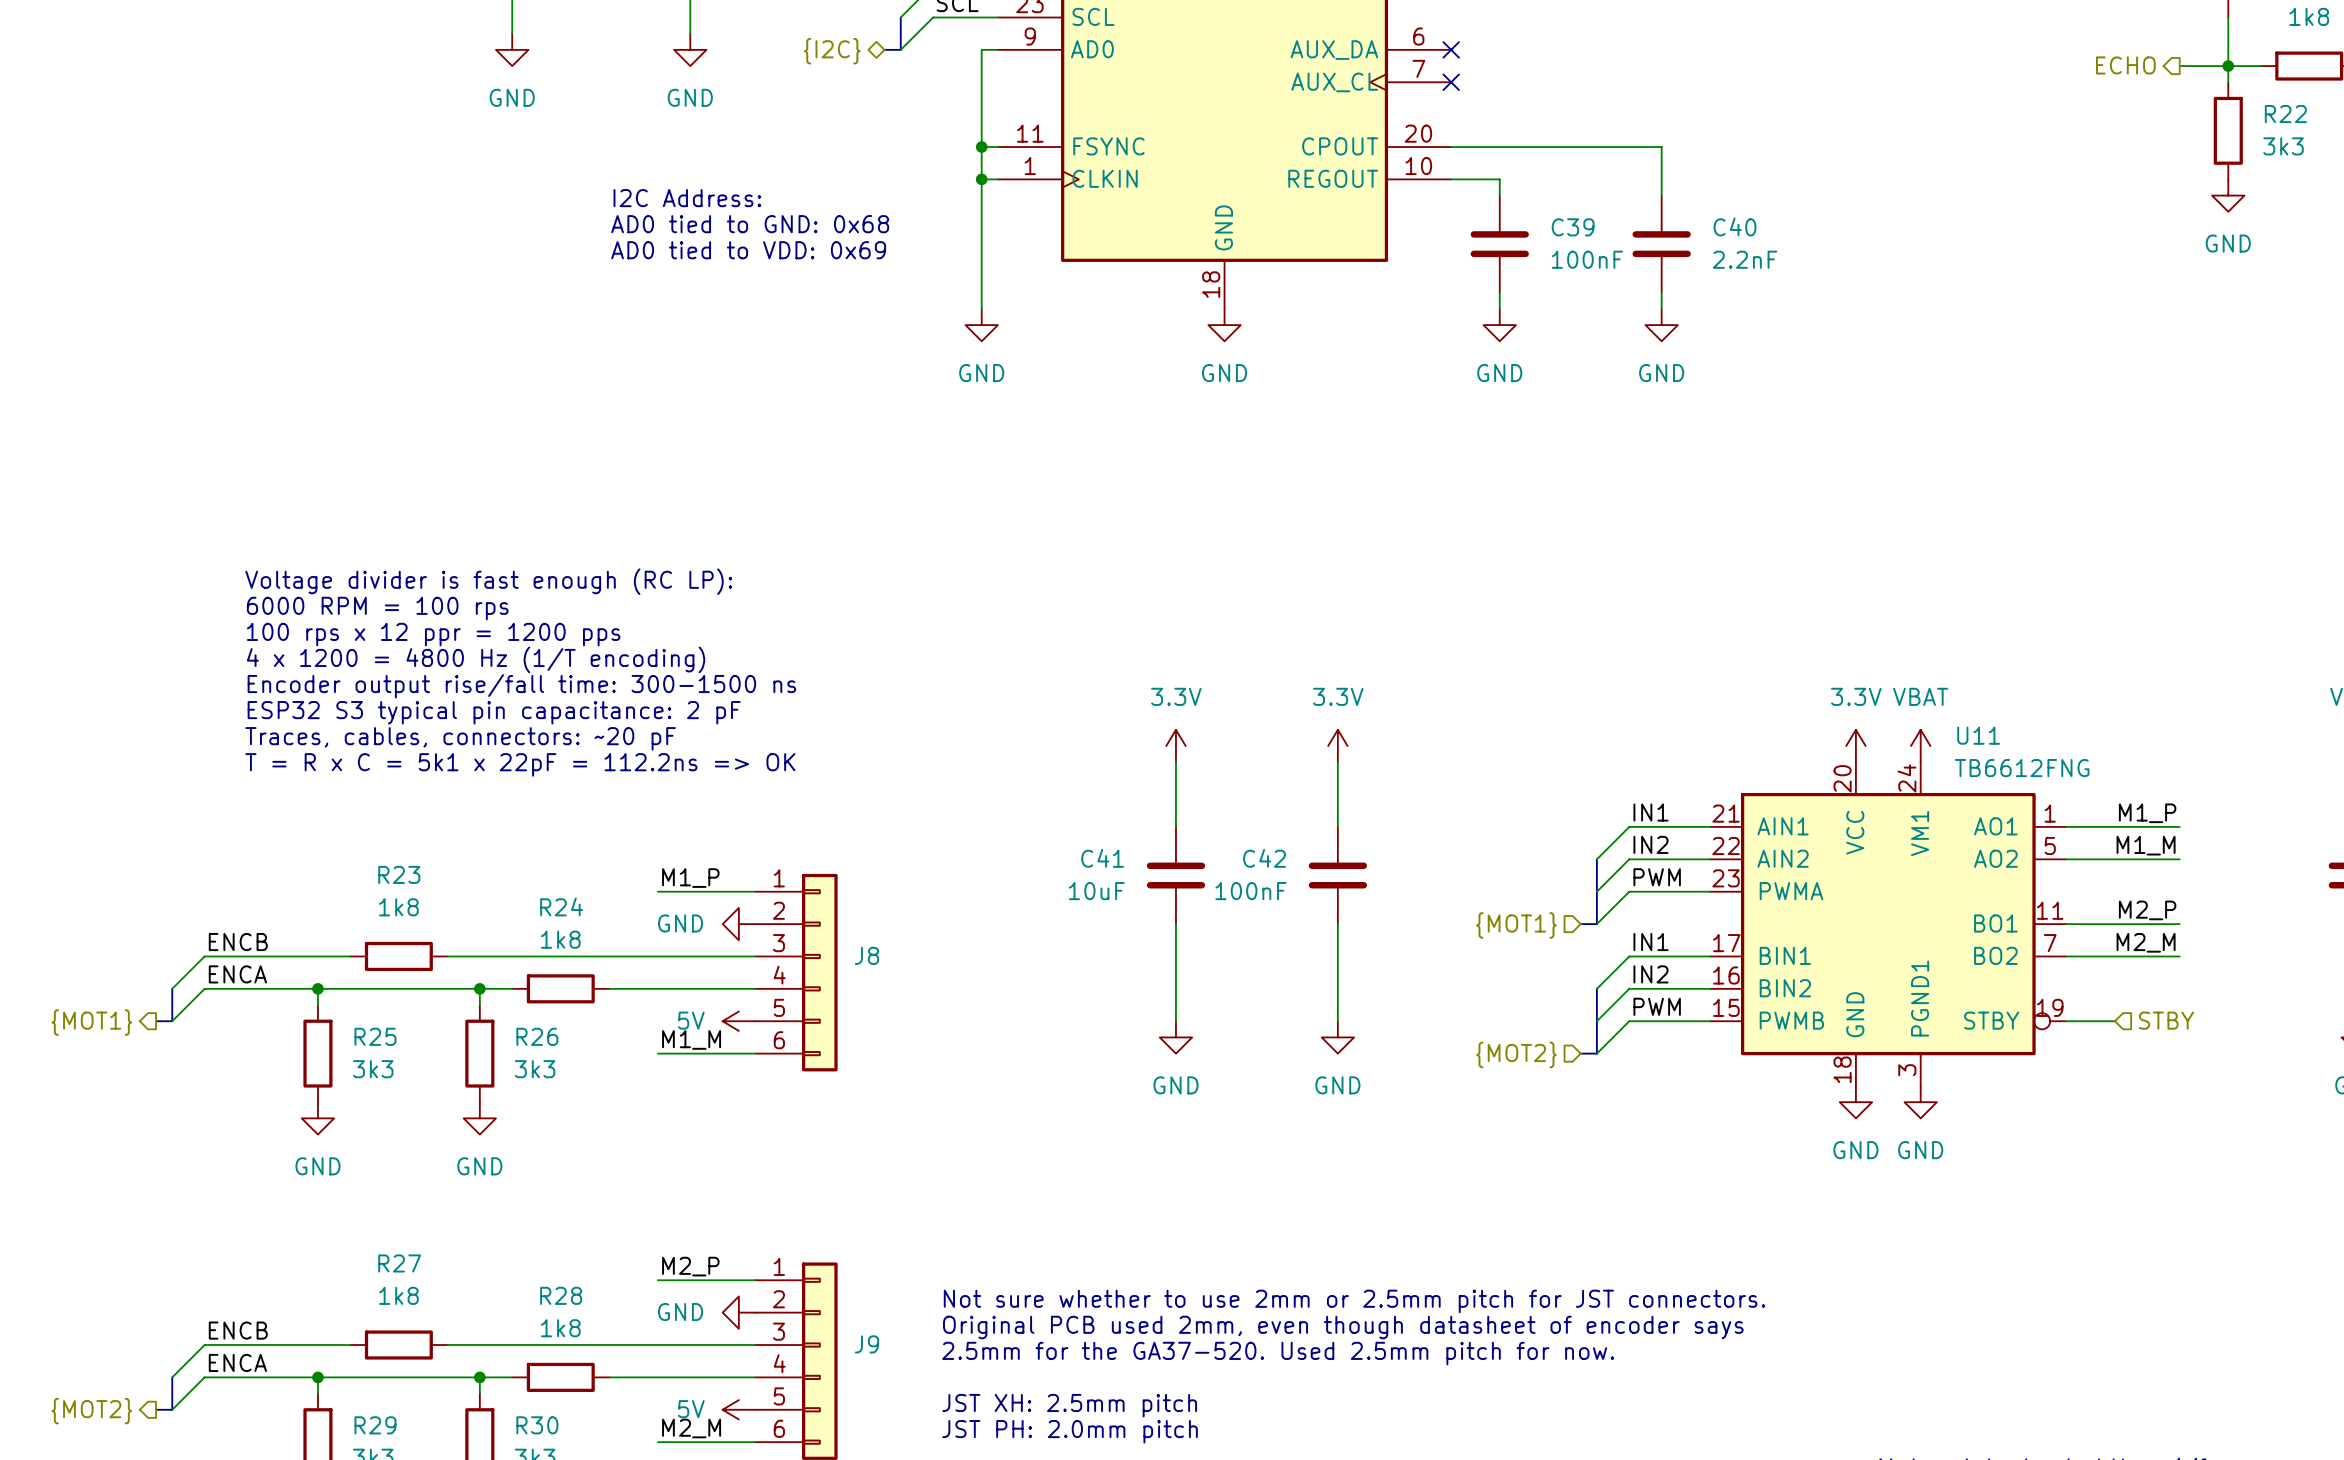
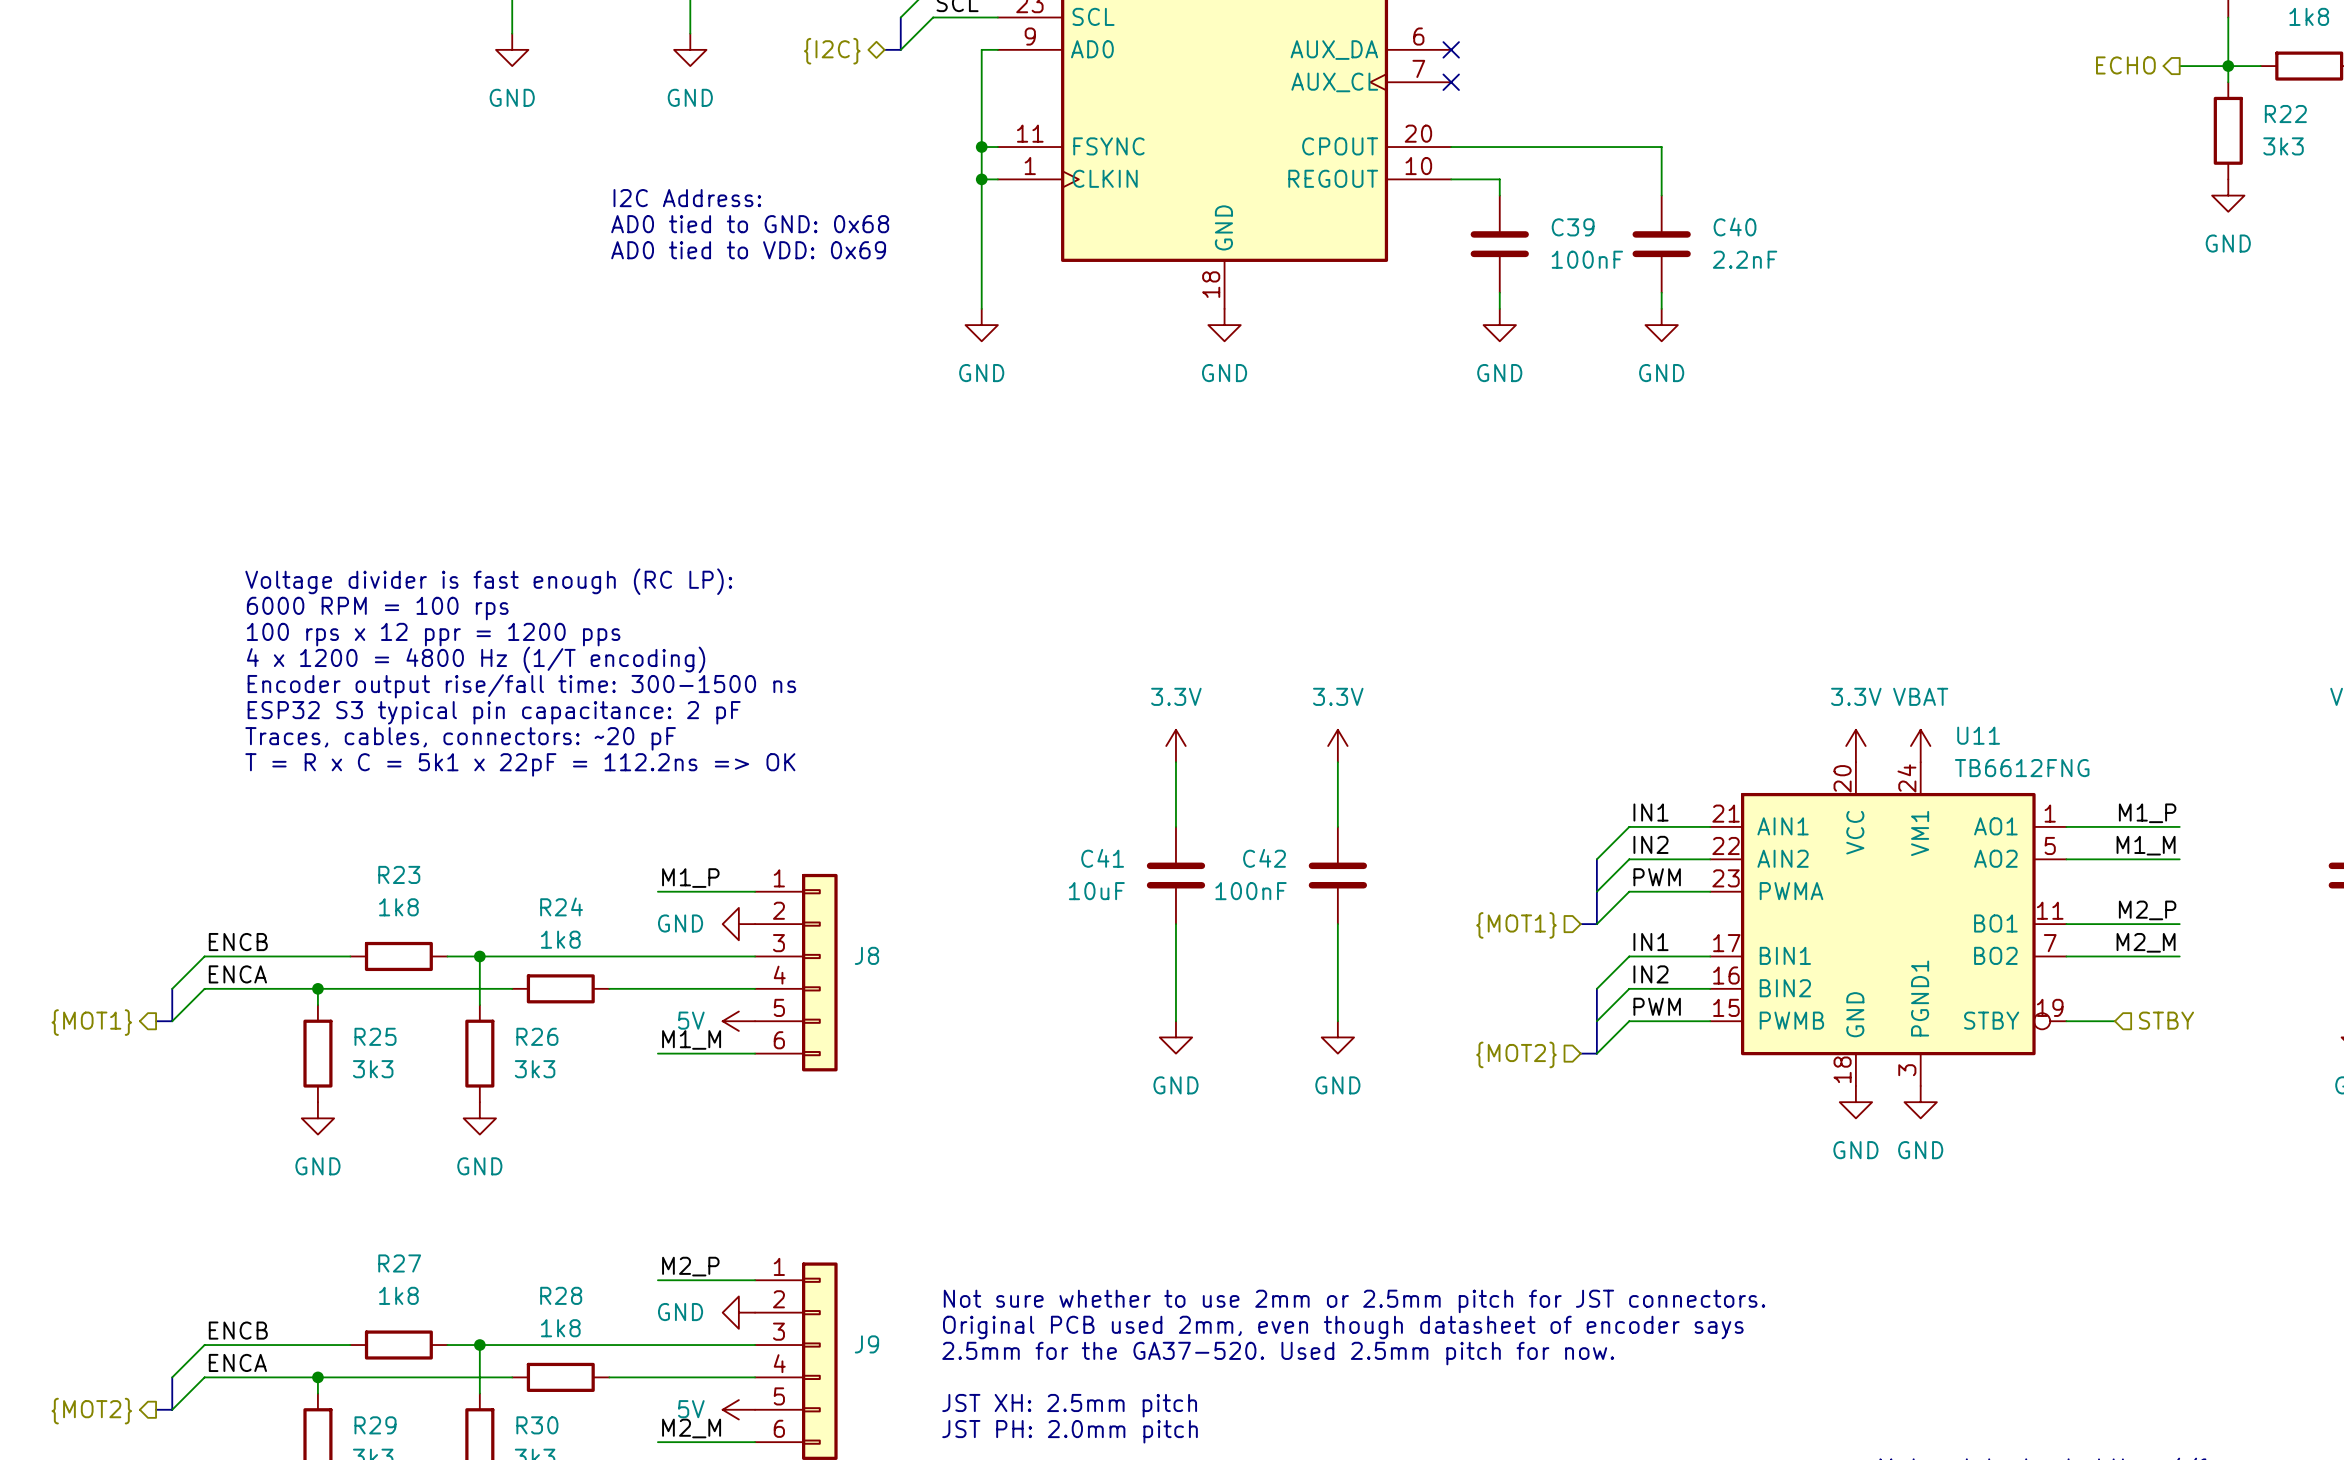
wire: none -> (479, 956) (479, 988)
junction position: (479, 988) -> (479, 956)
wire: none -> (479, 1345) (479, 1377)
junction position: (479, 1377) -> (479, 1345)

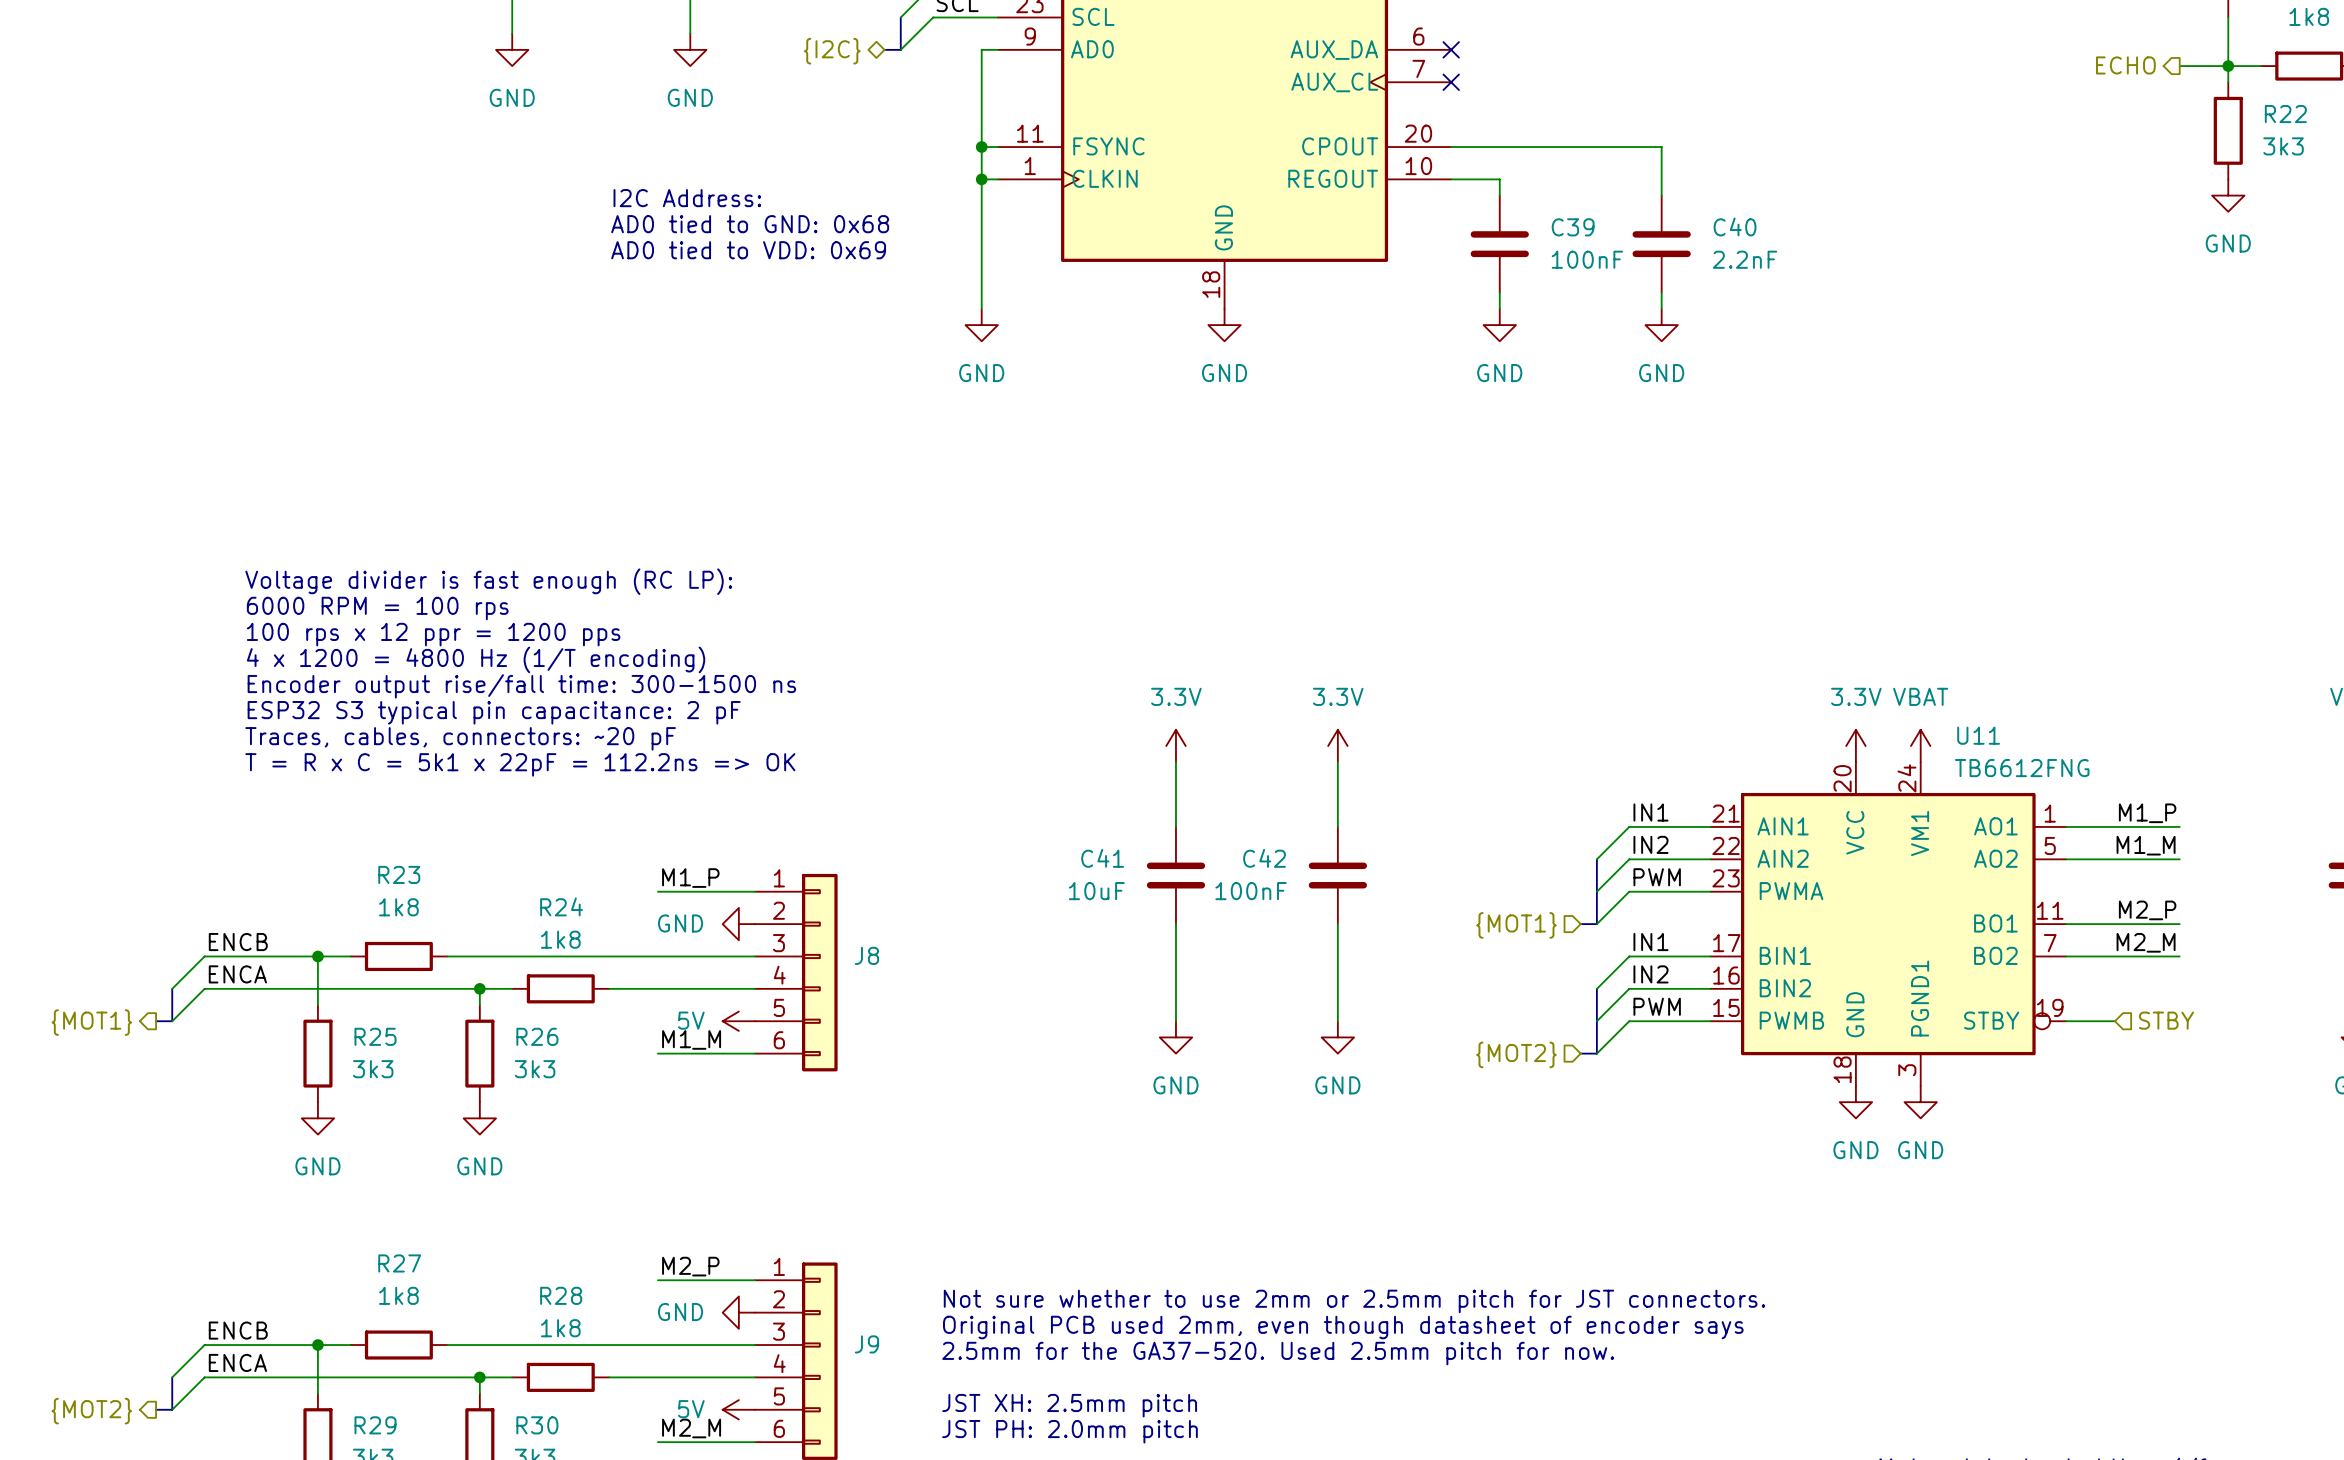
wire: (479, 956) (479, 988) -> (317, 956) (317, 988)
junction position: (479, 956) -> (479, 988)
junction position: (317, 988) -> (317, 956)
wire: (479, 1345) (479, 1377) -> (317, 1345) (317, 1377)
junction position: (479, 1345) -> (479, 1377)
junction position: (317, 1377) -> (317, 1345)

